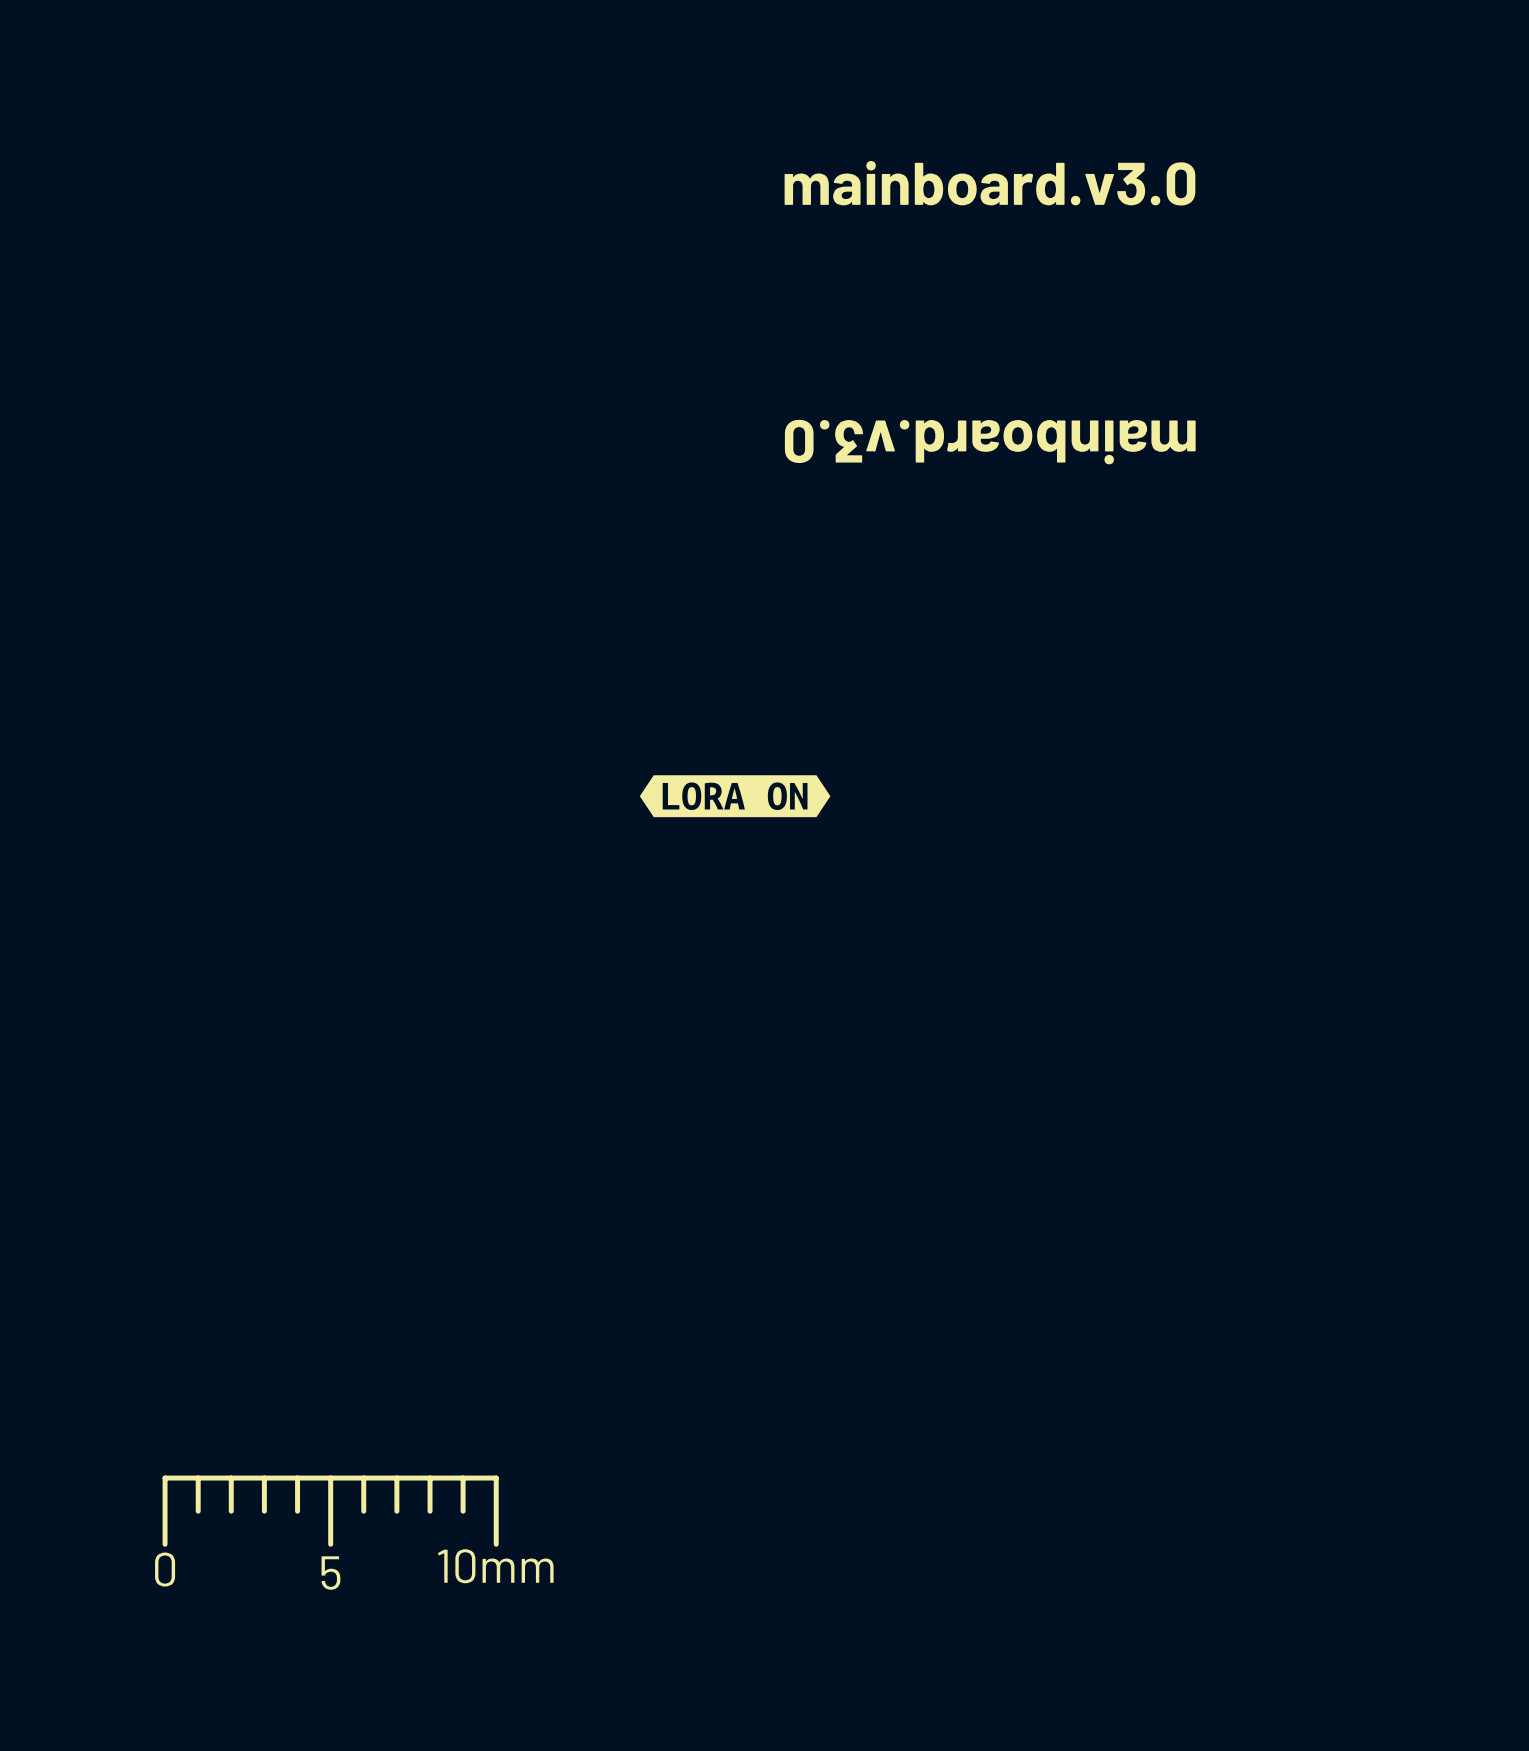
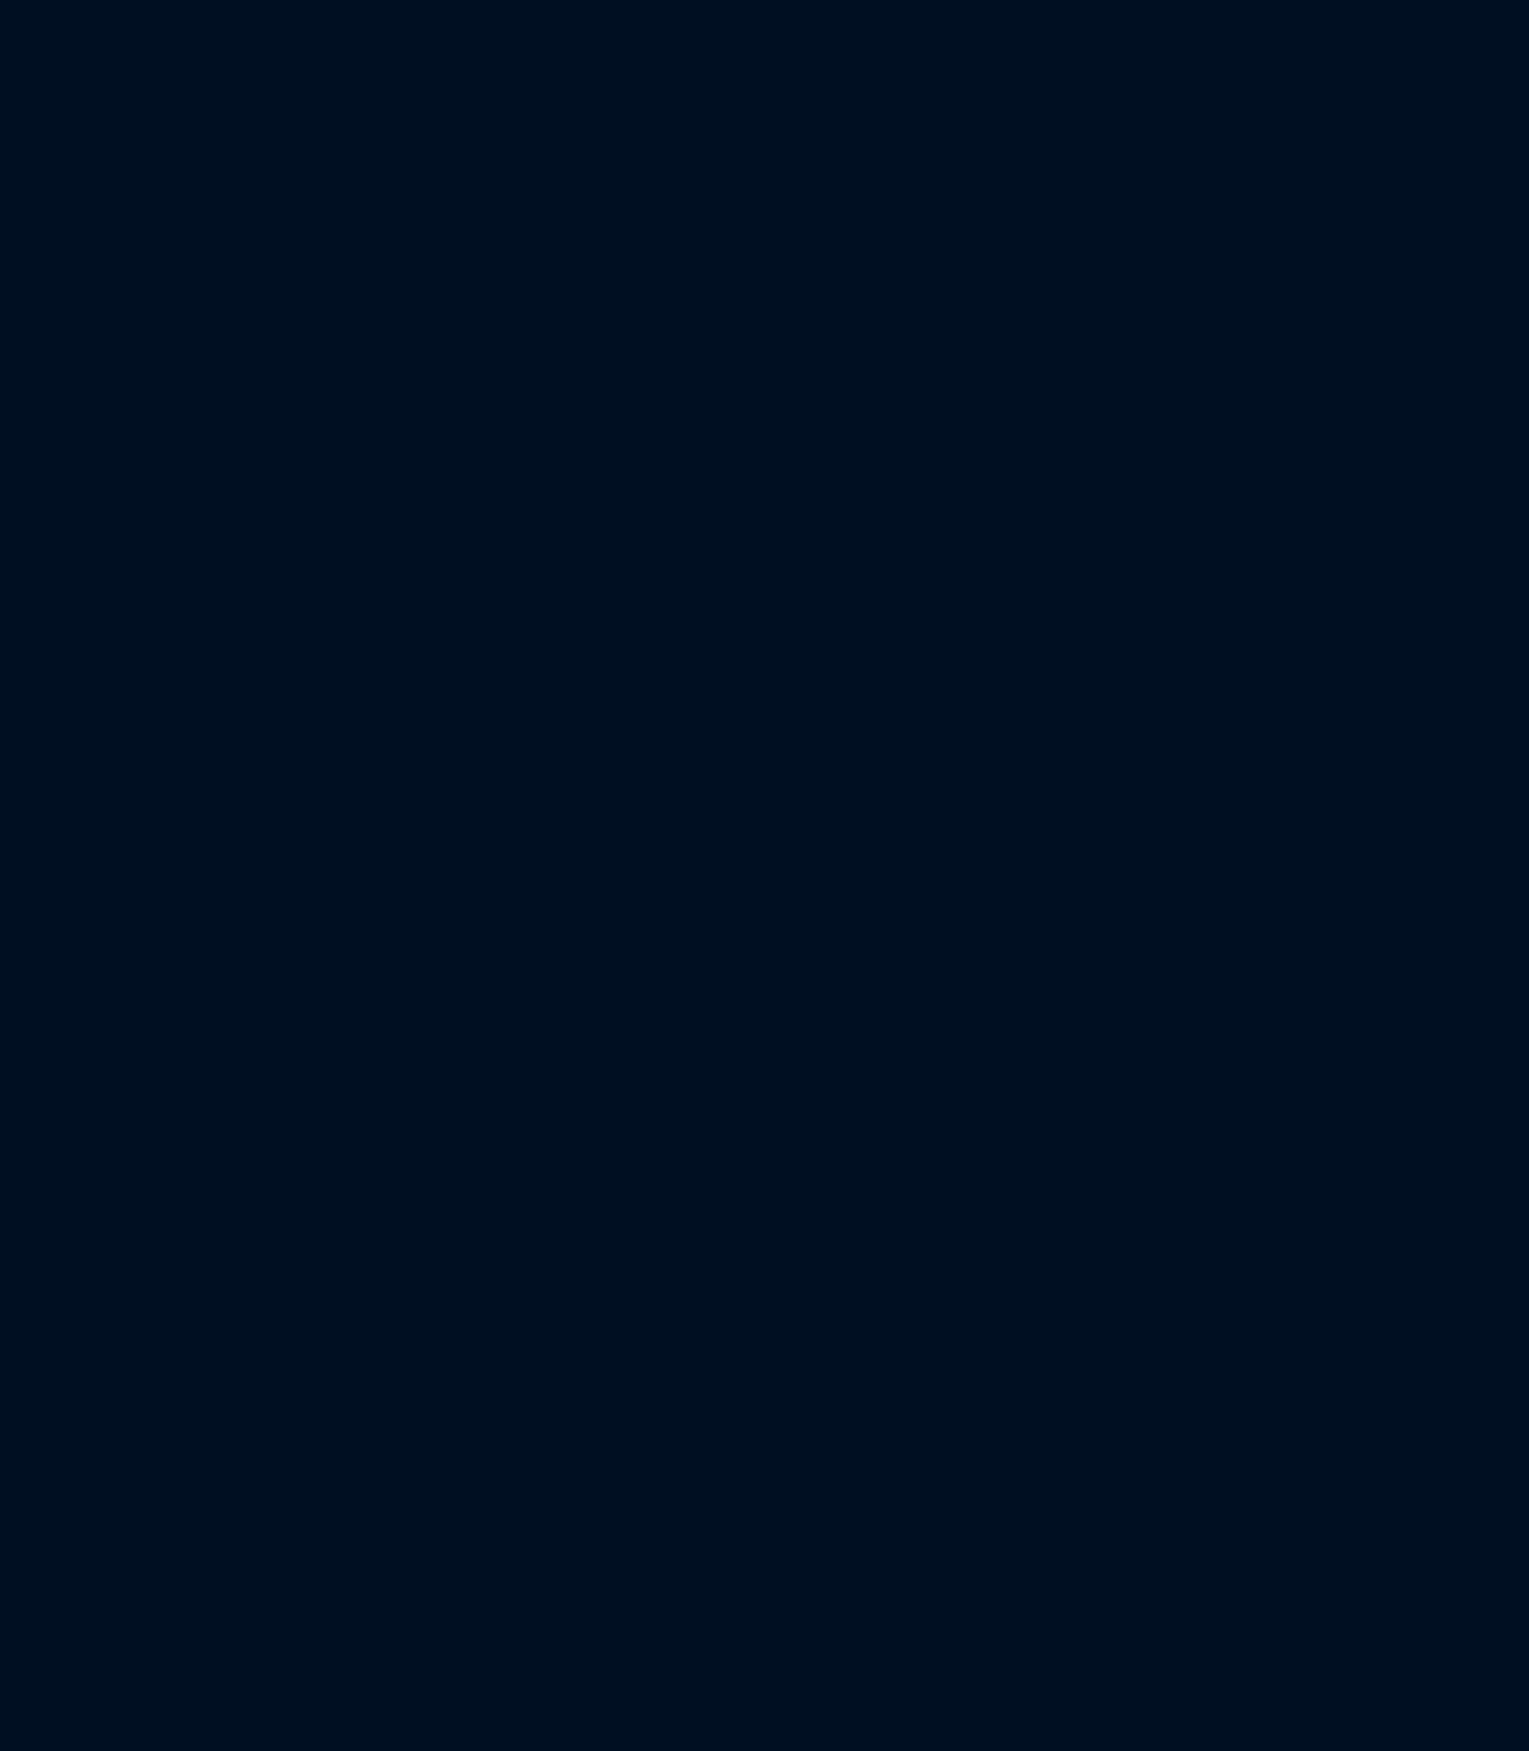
text: mainboard.v3.0 (989, 183) -> none
text: mainboard.v3.0 (990, 442) -> none
drawing: [639, 775, 831, 818] -> none
drawing: [162, 1475, 499, 1547] -> none

